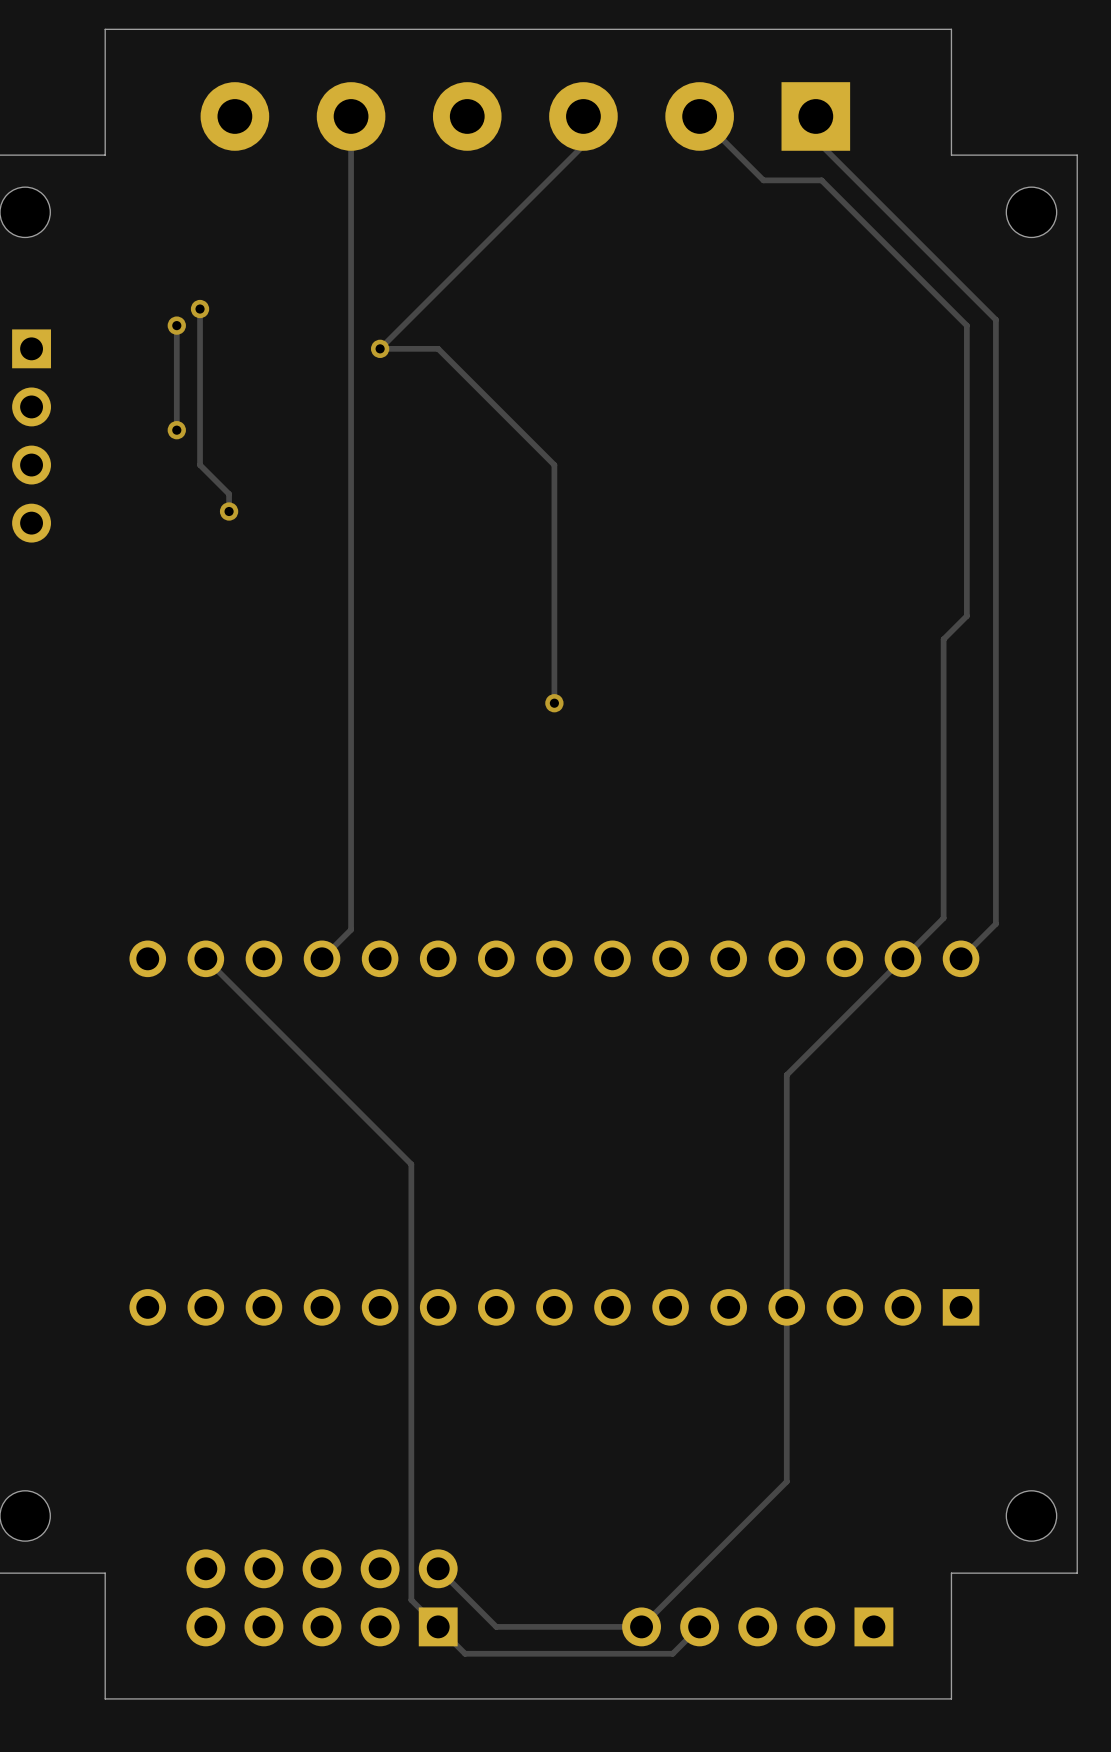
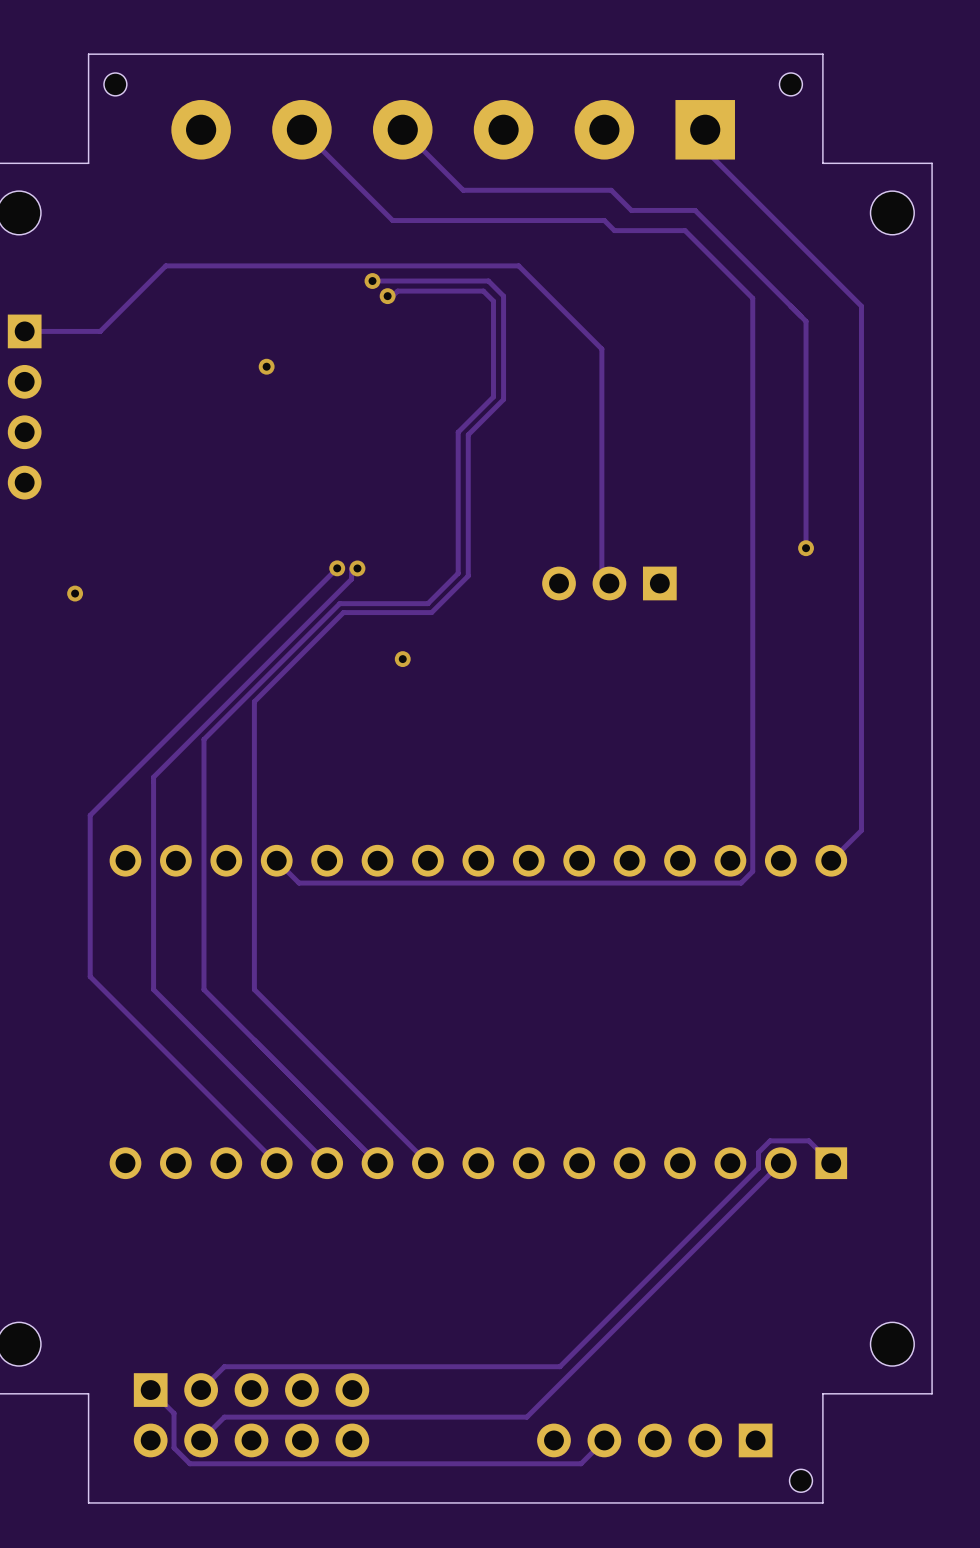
part: none -> (115, 84)
part: none -> (790, 84)
track: (351, 116) (351, 929) (322, 958) -> (301, 129) (392, 220) (604, 220) (614, 230) (685, 230) (752, 298) (752, 871) (741, 883) (299, 883) (276, 860)
track: none -> (402, 129) (463, 190) (611, 190) (631, 210) (695, 210) (806, 321) (806, 548)
track: (583, 116) (583, 145) (380, 348) (438, 348) (554, 465) (554, 703) -> none
track: (699, 116) (763, 180) (821, 180) (966, 325) (966, 616) (943, 639) (943, 918) (786, 1075) (786, 1481) (641, 1626) (496, 1626) (438, 1568) -> none
track: none -> (372, 281) (488, 281) (503, 296) (503, 399) (468, 434) (468, 575) (431, 612) (343, 612) (254, 701) (254, 989) (427, 1163)
via: none -> (372, 281)
track: none -> (387, 296) (392, 296) (397, 291) (483, 291) (493, 301) (493, 396) (458, 432) (458, 573) (427, 603) (339, 603) (203, 739) (203, 989) (377, 1163)
via: none -> (387, 296)
track: (200, 309) (200, 465) (229, 494) (229, 511) -> none
via: (200, 309) -> none
track: (176, 325) (176, 430) -> none
via: (176, 325) -> none
track: none -> (24, 331) (100, 331) (165, 265) (518, 265) (601, 349) (601, 575) (609, 583)
via: (380, 348) -> none
via: none -> (266, 366)
via: (176, 430) -> none
via: (229, 511) -> none
via: none -> (806, 548)
track: none -> (337, 568) (90, 815) (90, 976) (276, 1163)
via: none -> (337, 568)
track: none -> (357, 568) (351, 569) (351, 579) (153, 777) (153, 989) (327, 1163)
via: none -> (357, 568)
part: none -> (609, 583)
via: none -> (75, 593)
via: (554, 703) -> none
via: none -> (402, 659)
track: (205, 958) (411, 1164) (411, 1600) (465, 1653) -> (150, 1390) (174, 1413) (174, 1447) (189, 1463) (400, 1463)
track: none -> (780, 1163) (526, 1417) (224, 1417) (201, 1440)
track: none -> (831, 1163) (808, 1140) (770, 1140) (758, 1152) (758, 1168) (559, 1366) (224, 1366) (201, 1390)
part rotation: 0° (322, 1597) -> 180° (251, 1415)
part: none -> (800, 1480)

